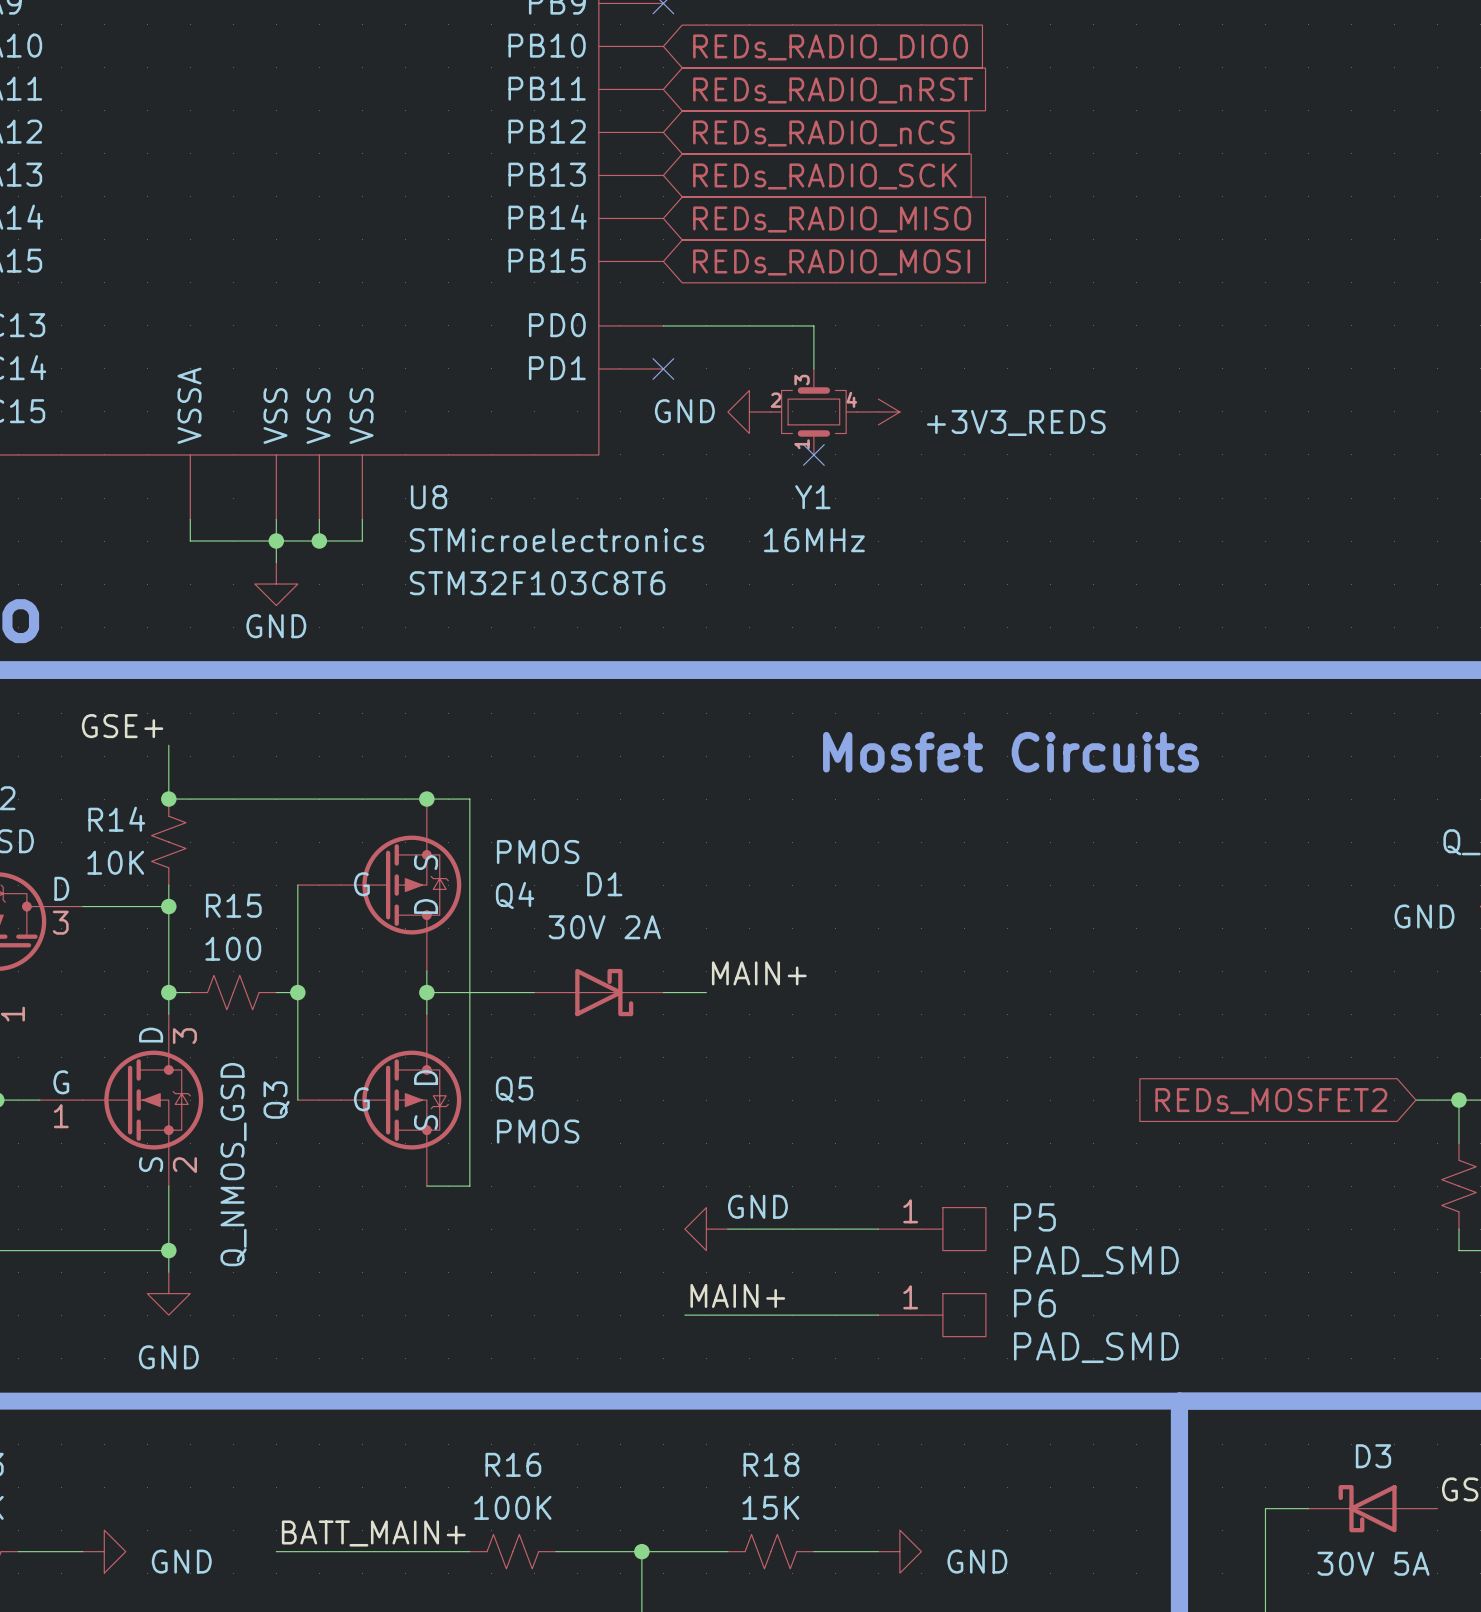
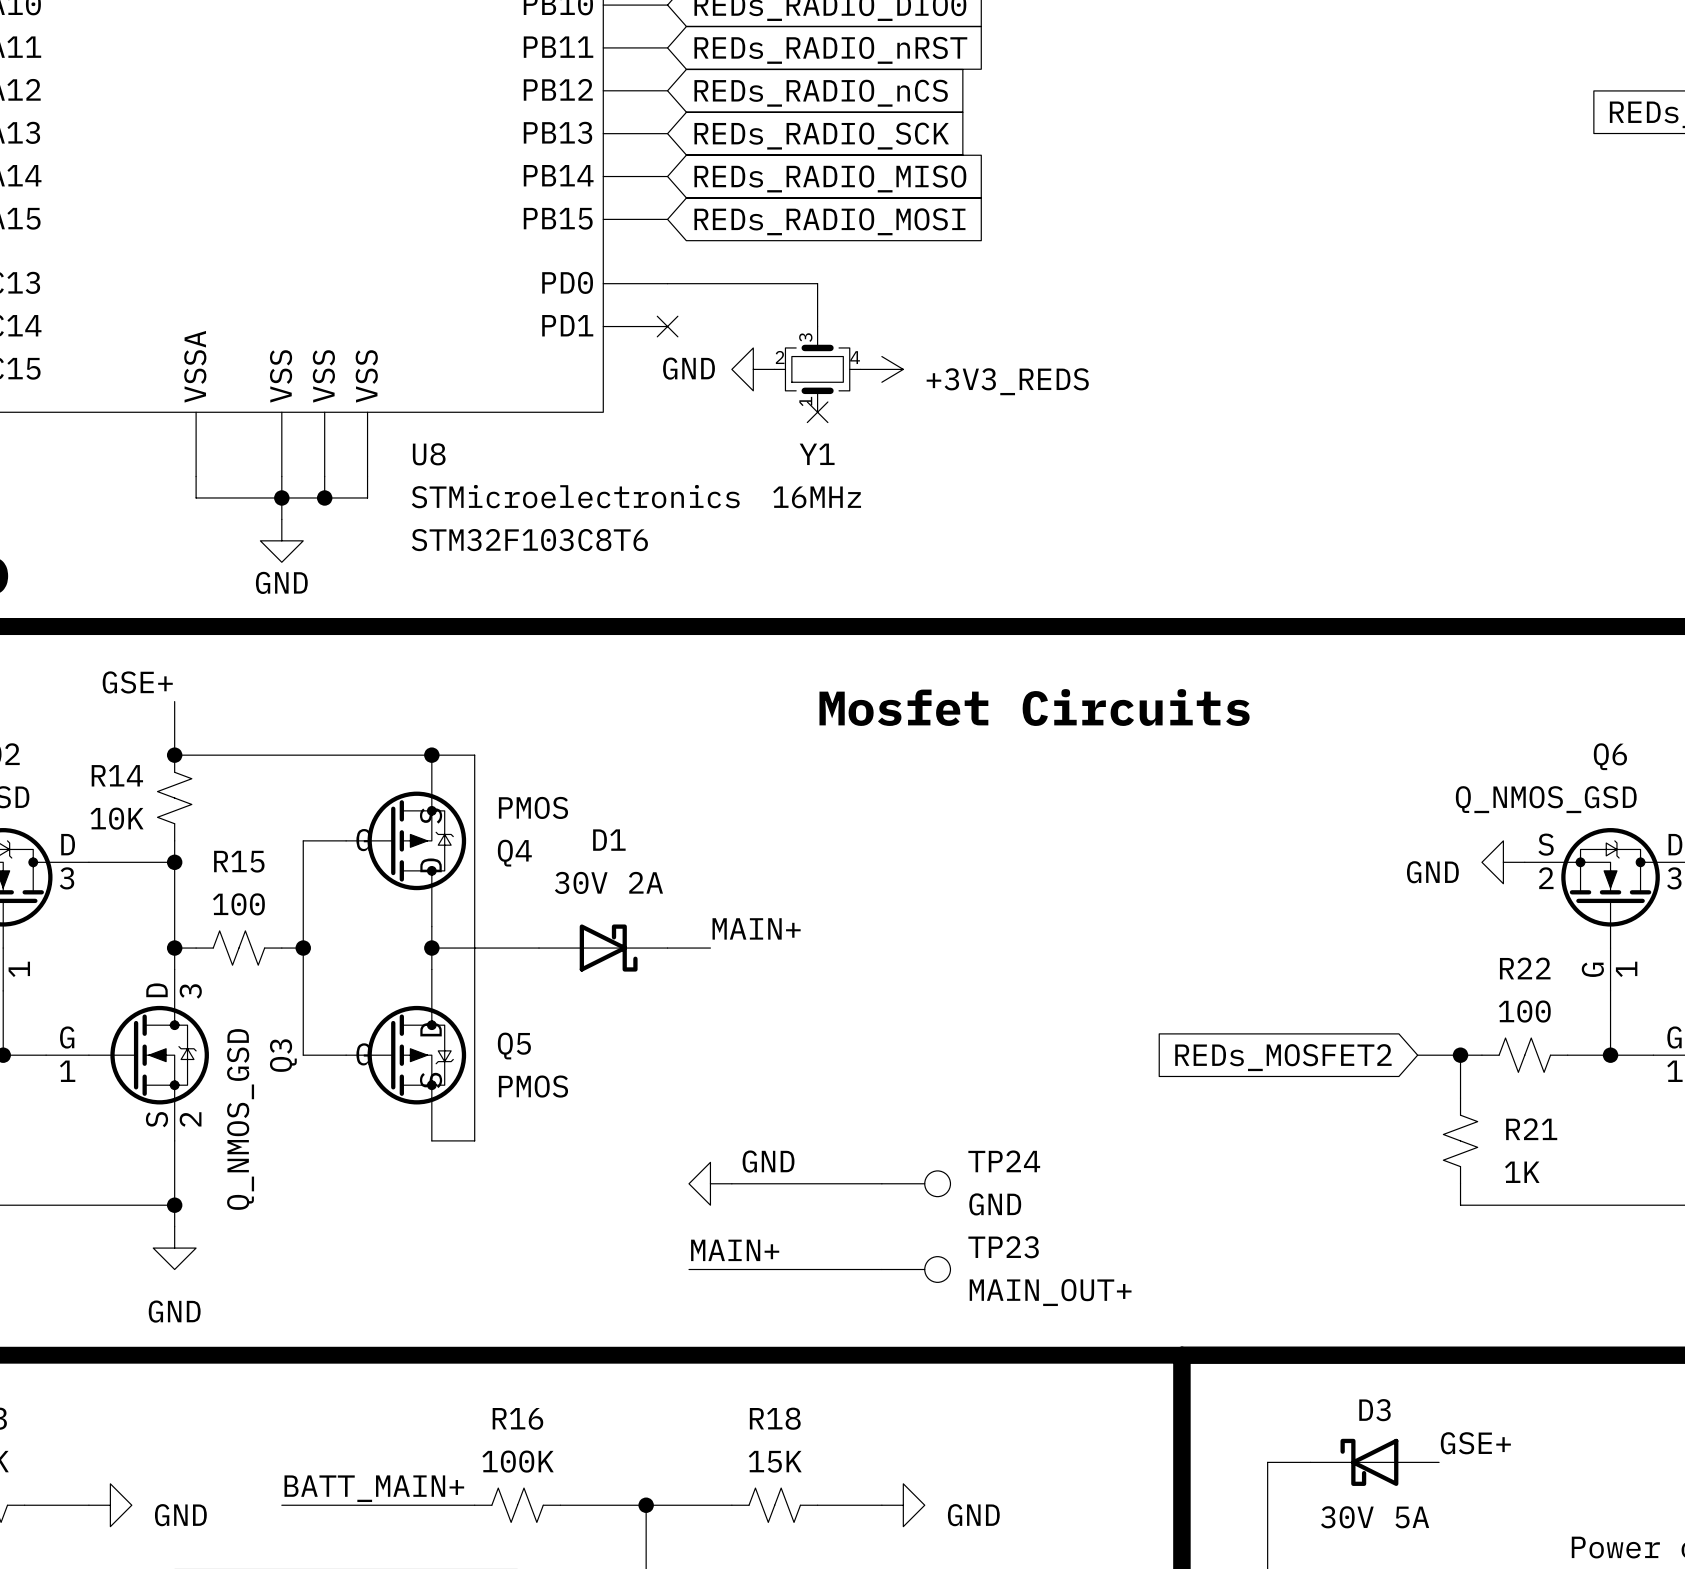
TP24: none -> GND (916, 1183)
P5: PAD_SMD (932, 1229) -> none
TP23: none -> MAIN_OUT+ (916, 1269)
P6: PAD_SMD (932, 1315) -> none

